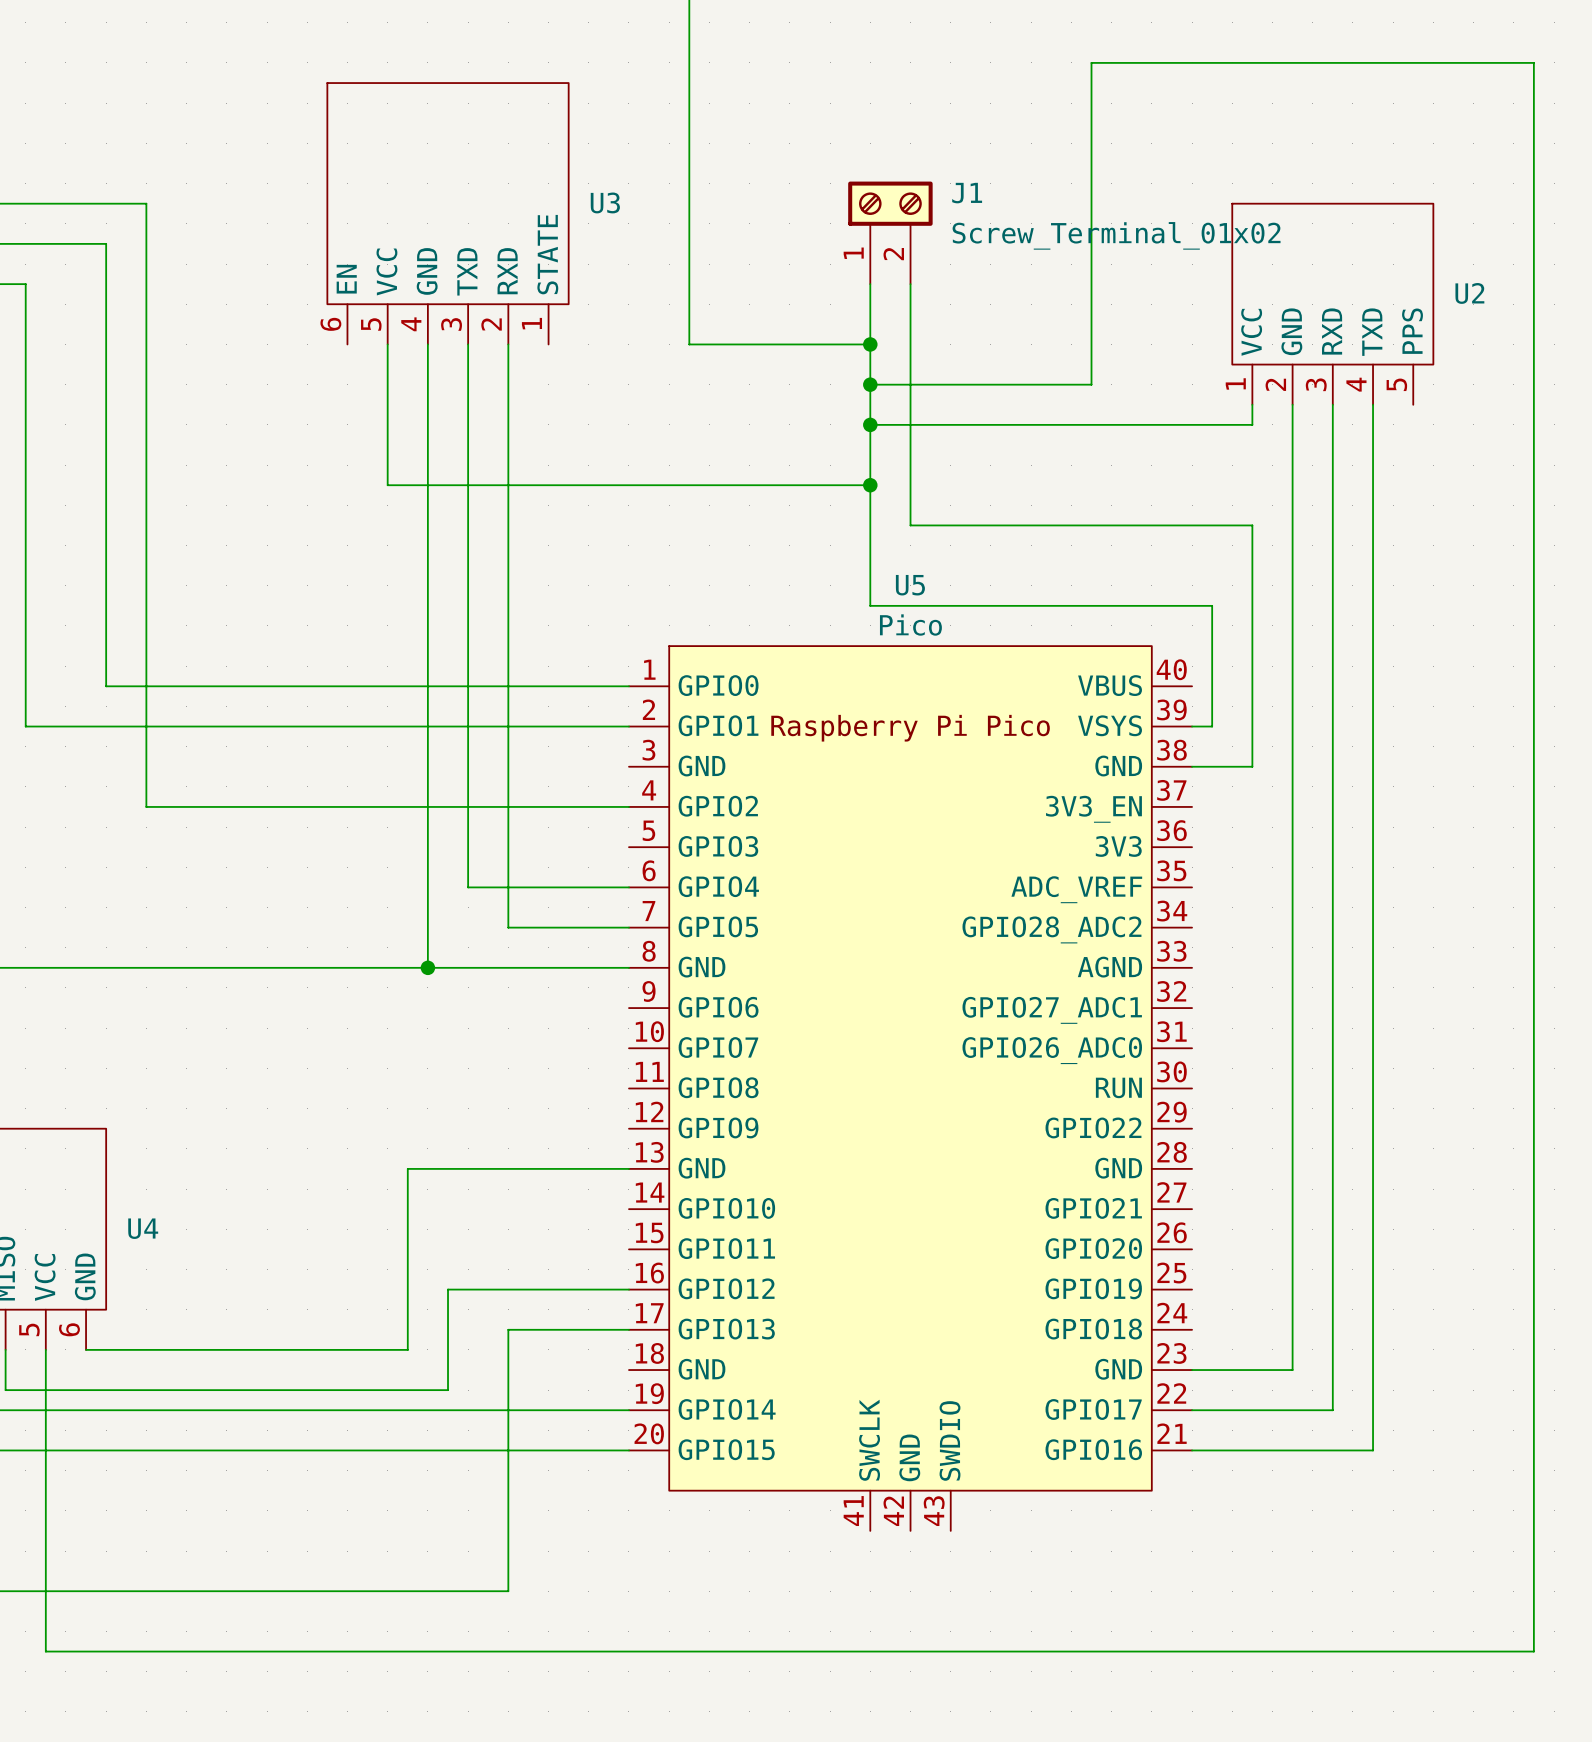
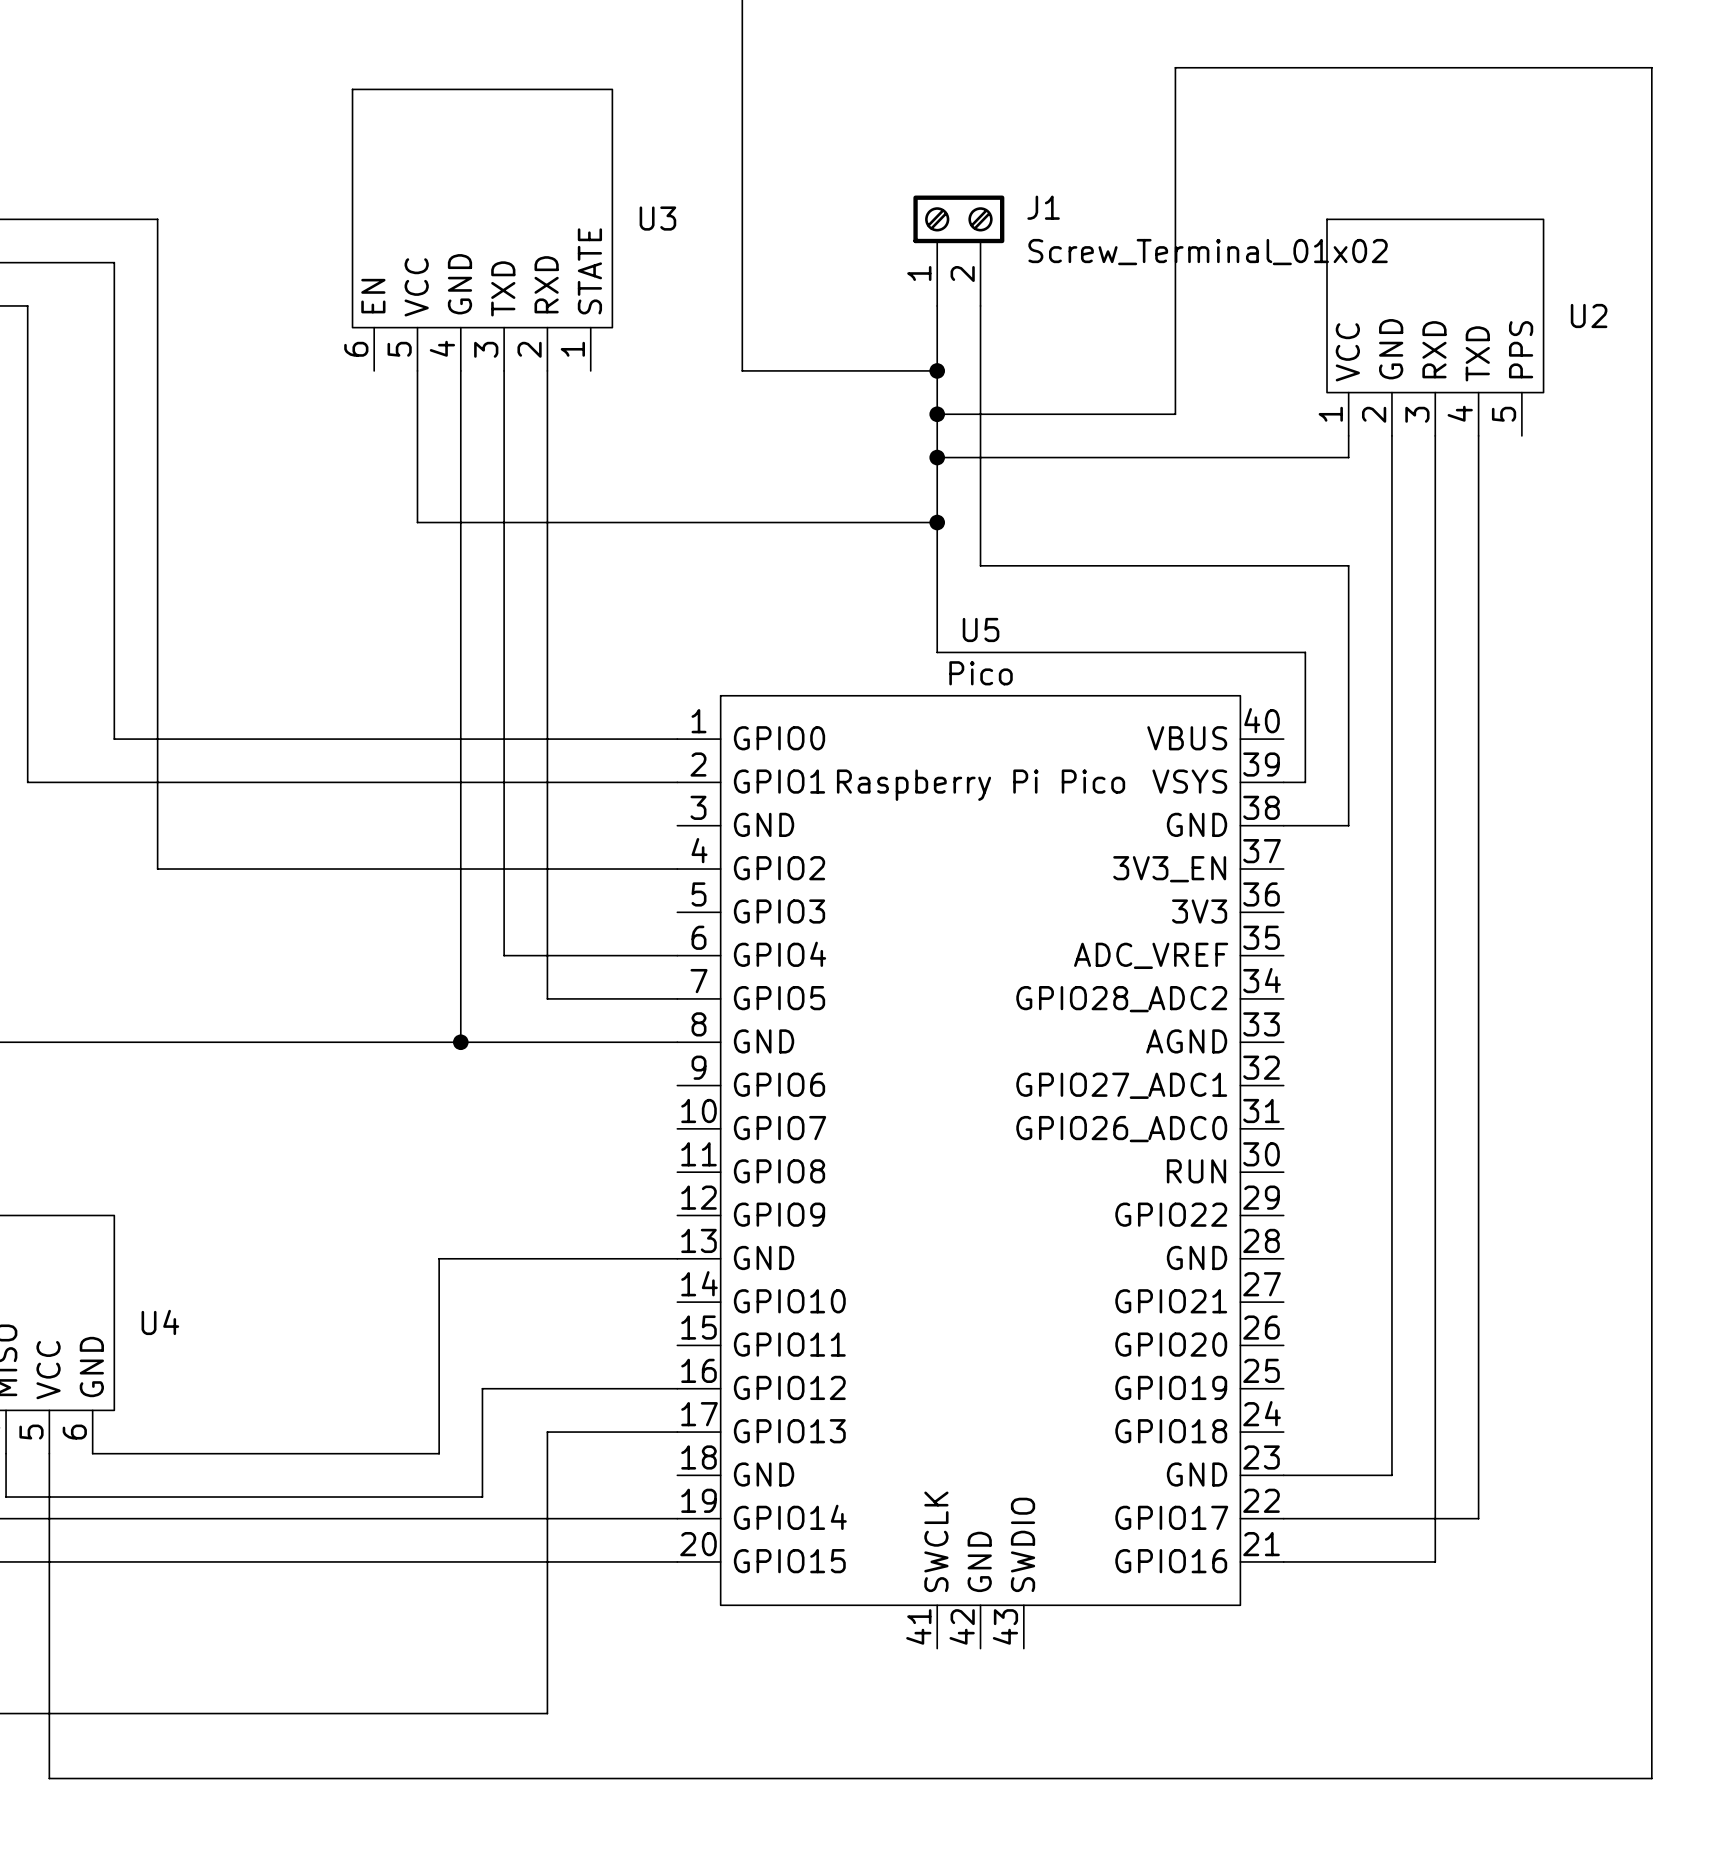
wire: (1373, 1410) (1373, 1450) (1332, 1450) -> (1478, 1518) (1435, 1518) (1435, 1561)

